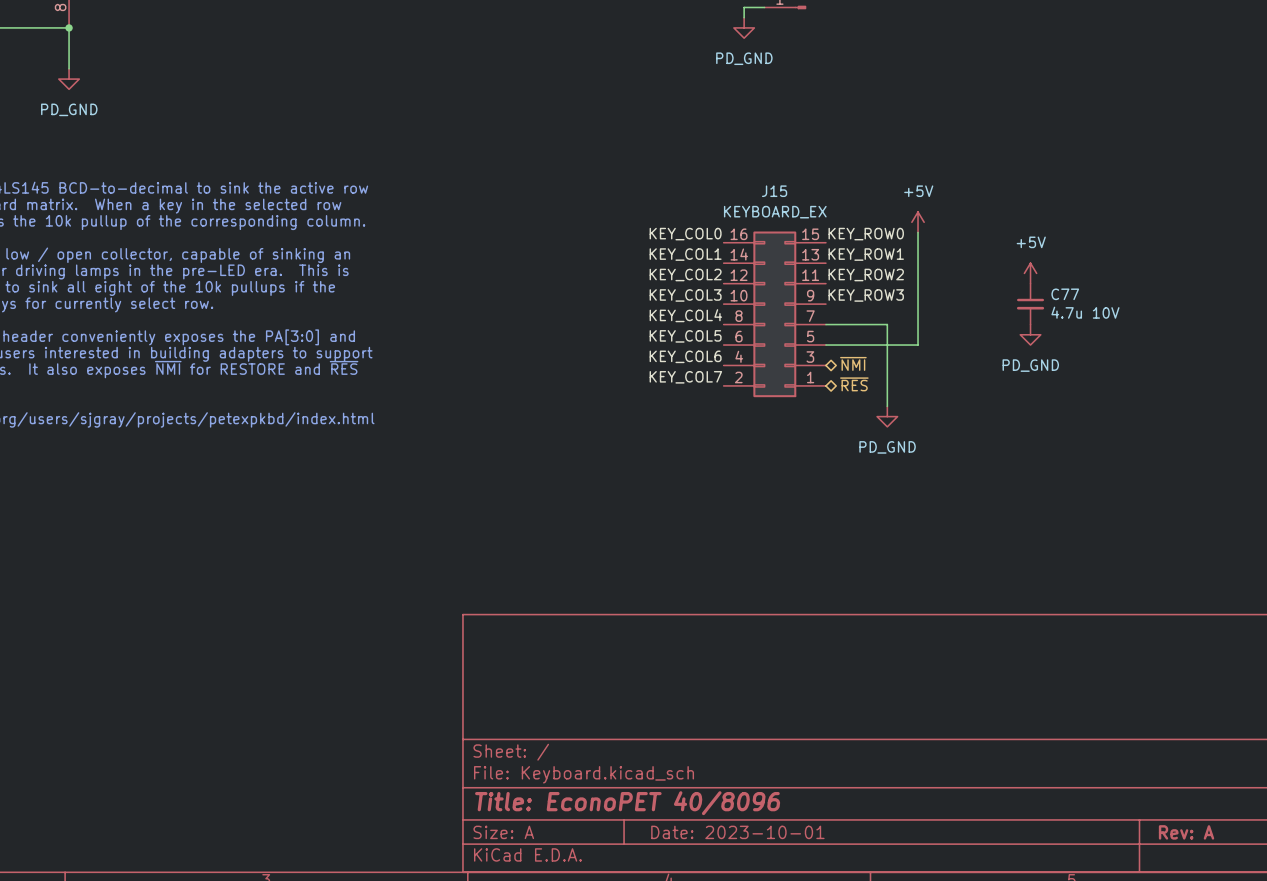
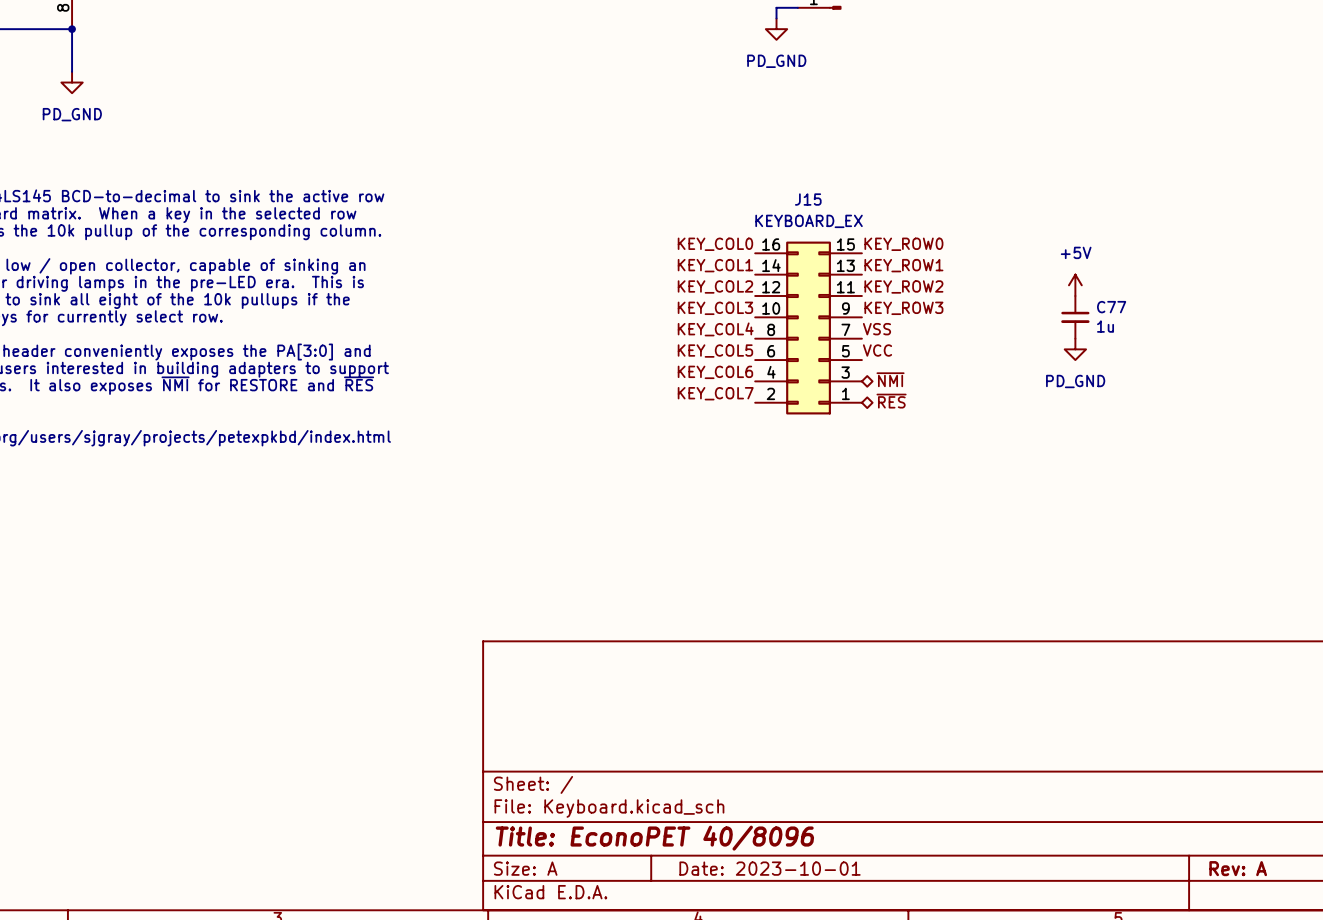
power symbol: +5V (918, 222) -> none
wire: (918, 232) (918, 345) (825, 345) -> none
C77 value: 4.7u 10V (1085, 312) -> 1u (1105, 326)
label: none -> VSS (876, 329)
wire: (825, 324) (887, 324) (887, 406) -> none
label: none -> VCC (877, 350)
power symbol: PD_GND (887, 416) -> none

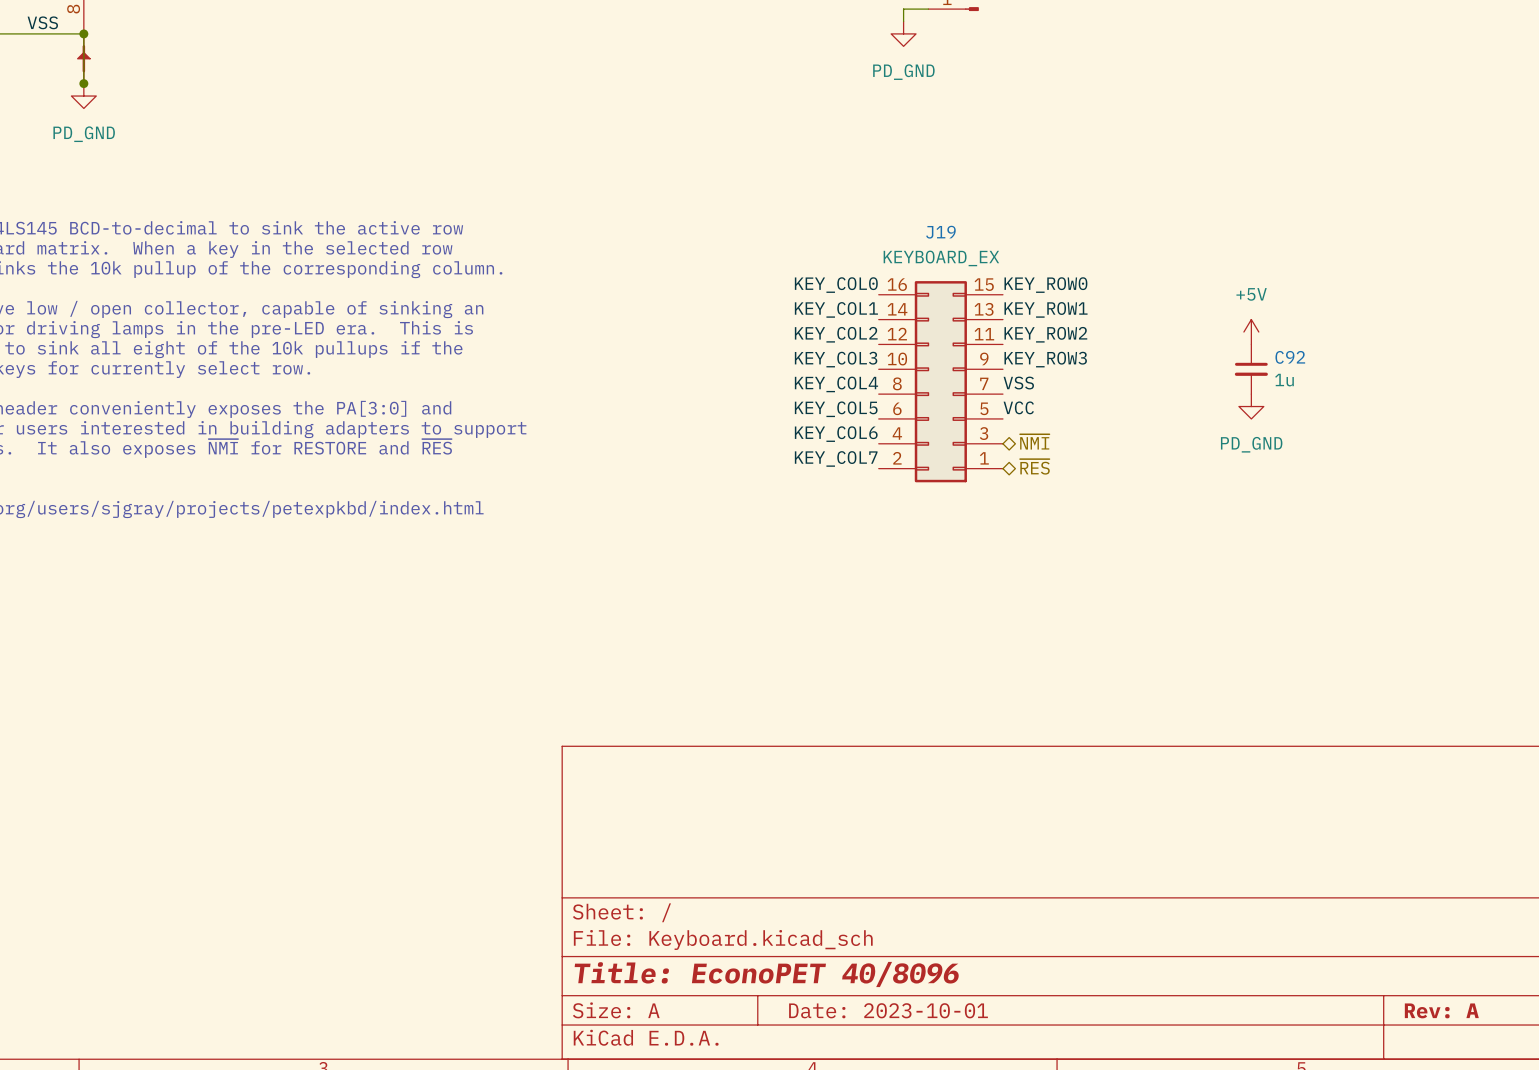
label: none -> VSS (42, 22)
part: none -> (83, 58)
junction: none -> (83, 83)
J15 name: J15 (808, 199) -> J19 (940, 232)
C77 name: C77 (1111, 307) -> C92 (1290, 357)

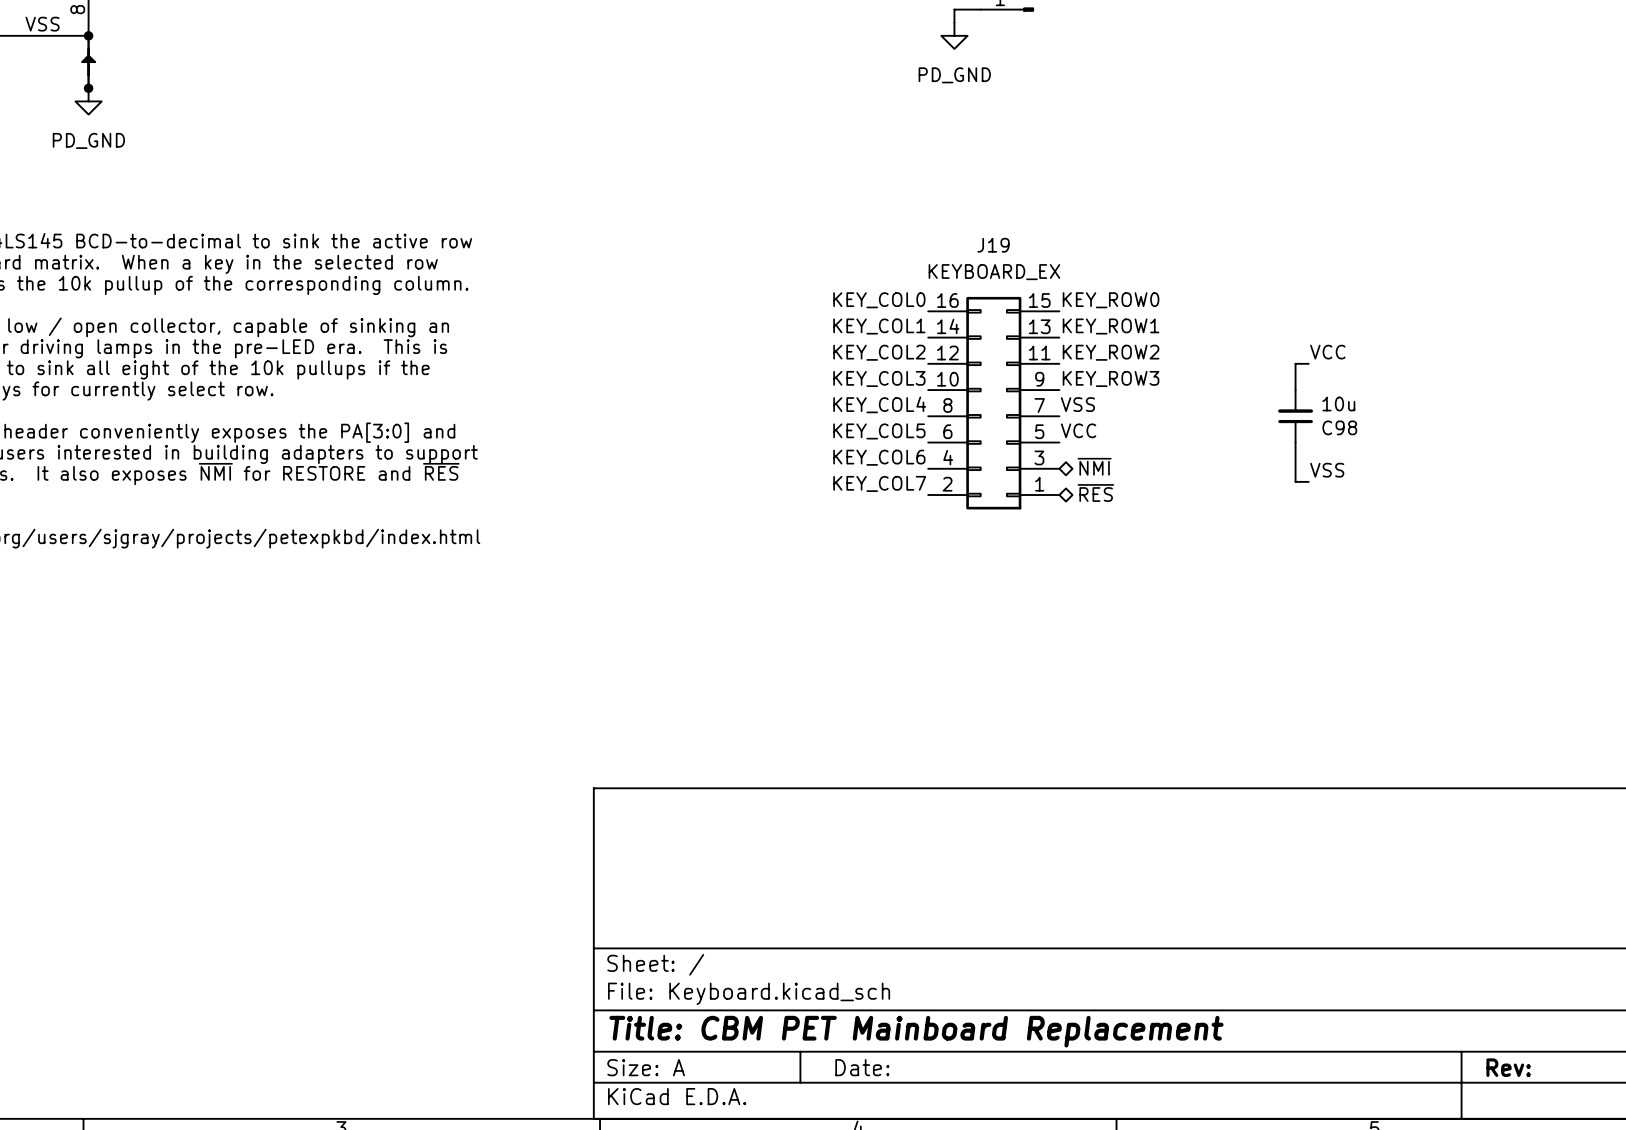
power symbol: +5V (1251, 332) -> none
label: none -> VCC (1327, 352)
wire: none -> (1308, 363) (1295, 363) (1295, 390)
C92: 1u (1251, 369) -> none
C98: none -> 10u (1295, 416)
power symbol: PD_GND (1251, 406) -> none
wire: none -> (1295, 442) (1295, 481) (1308, 481)
label: none -> VSS (1327, 470)
title block: Title: EconoPET 40/8096 (766, 974) -> Title: CBM PET Mainboard Replacement (916, 1031)
title block: Date: 2023-10-01 (888, 1010) -> Date: (862, 1067)
title block: Rev: A (1441, 1010) -> Rev: (1508, 1067)

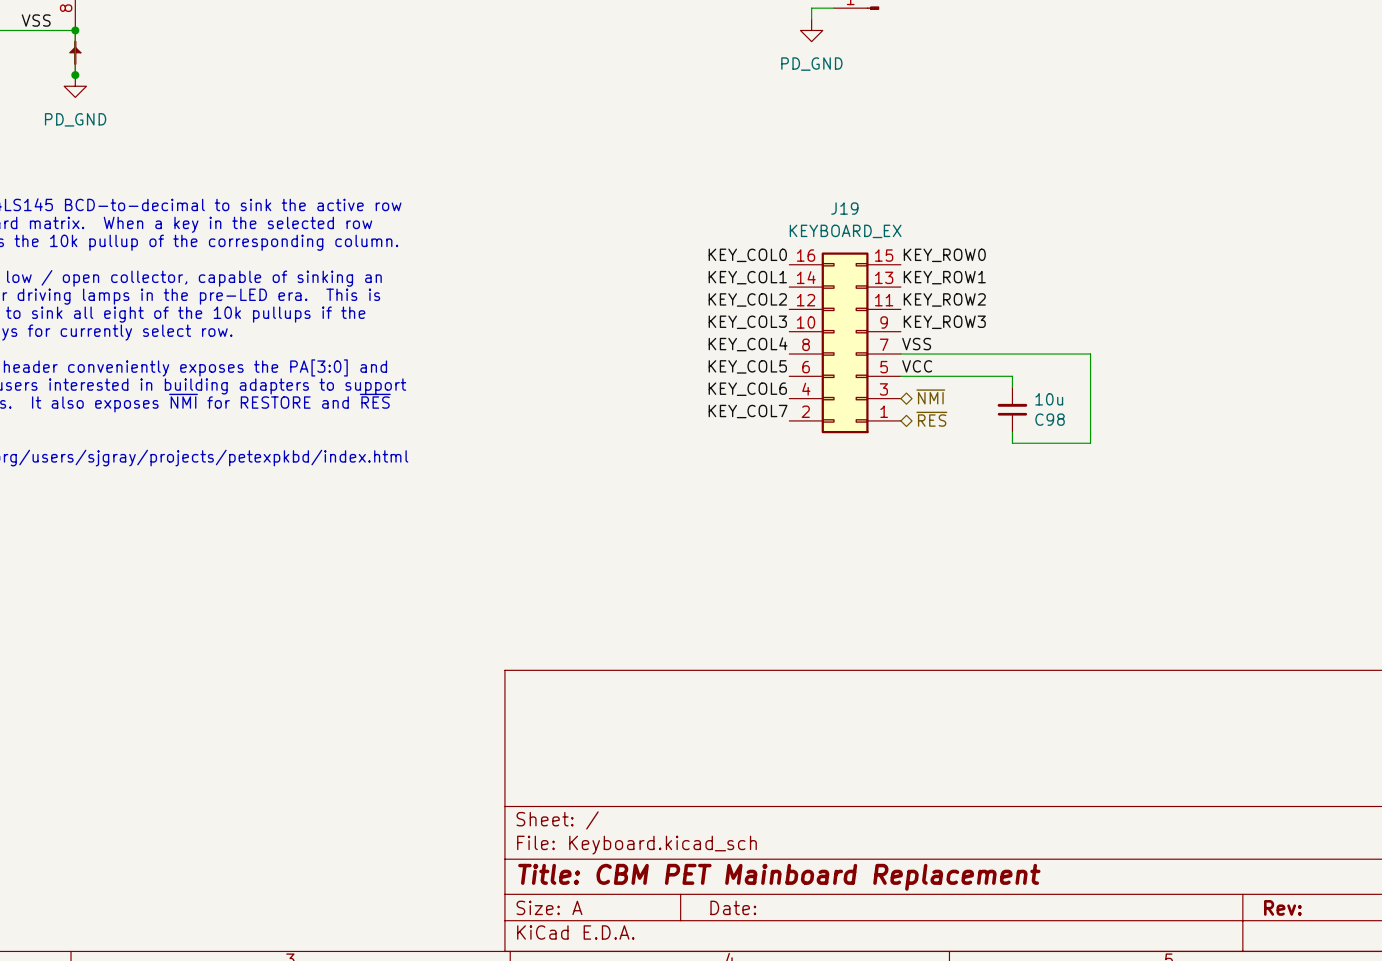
label: VCC (1327, 352) -> none
wire: (1308, 363) (1295, 363) (1295, 390) -> none
wire: none -> (900, 354) (1090, 354) (1090, 443) (1012, 443) (1012, 432)
C98 position: (1295, 416) -> (1012, 409)
wire: none -> (900, 376) (1012, 376) (1012, 387)
wire: (1295, 442) (1295, 481) (1308, 481) -> none
label: VSS (1327, 470) -> none

